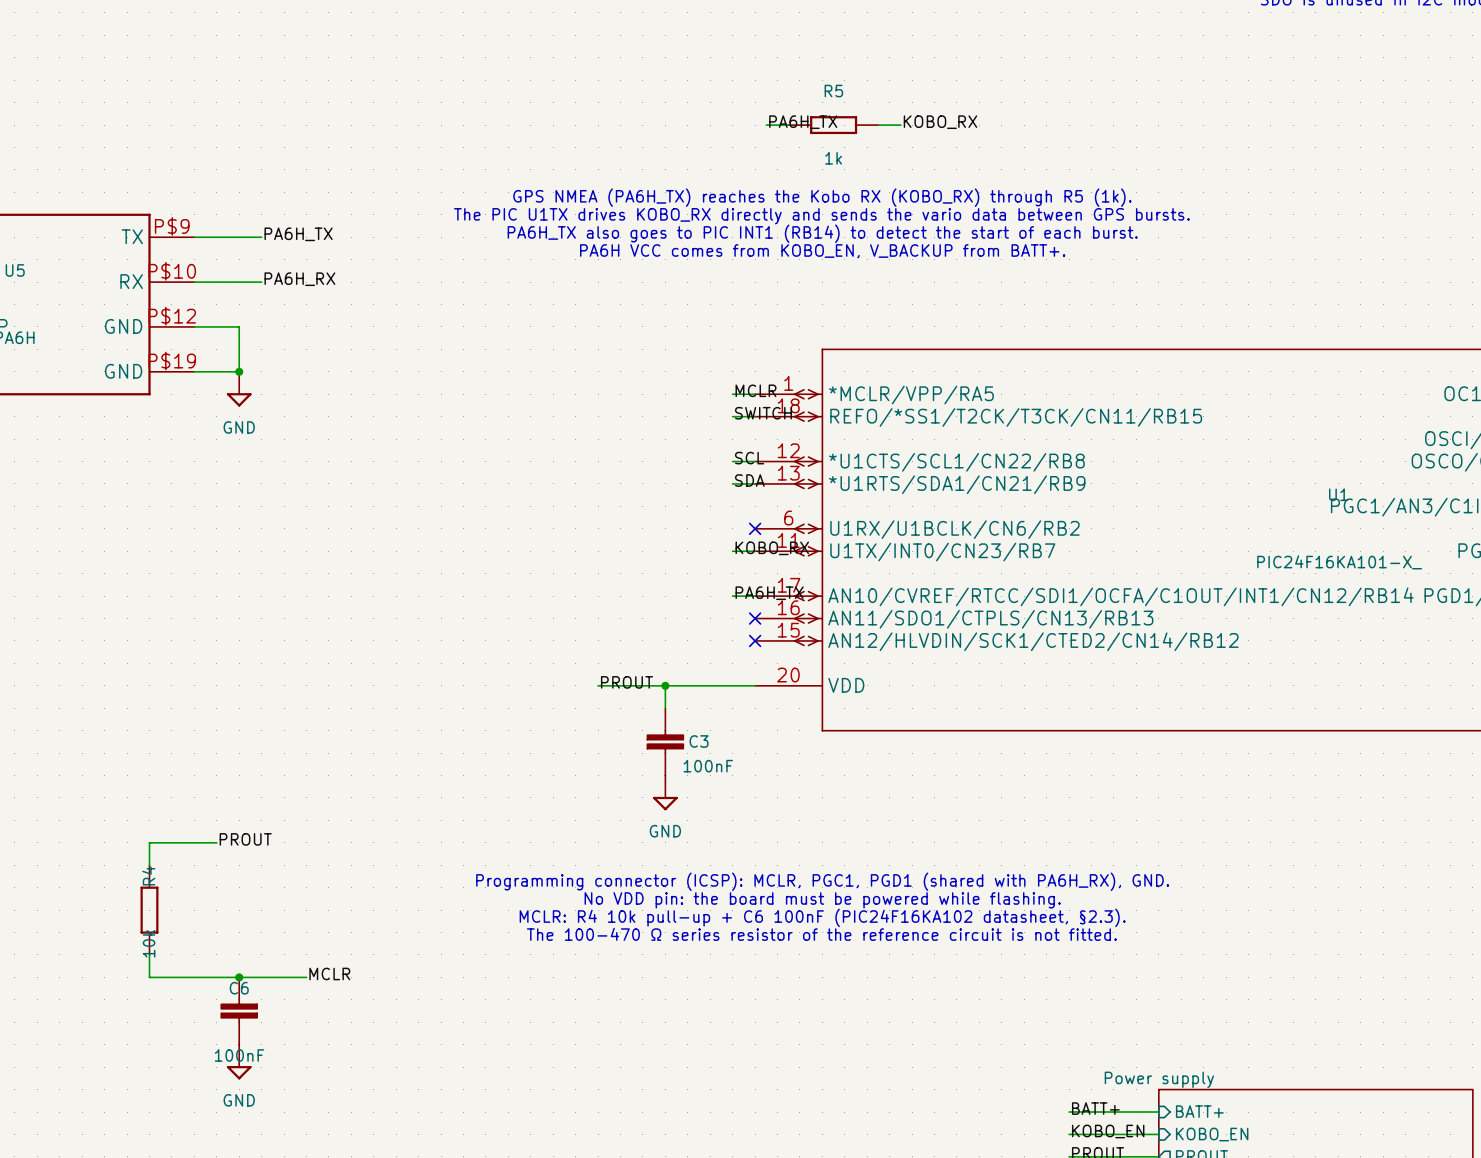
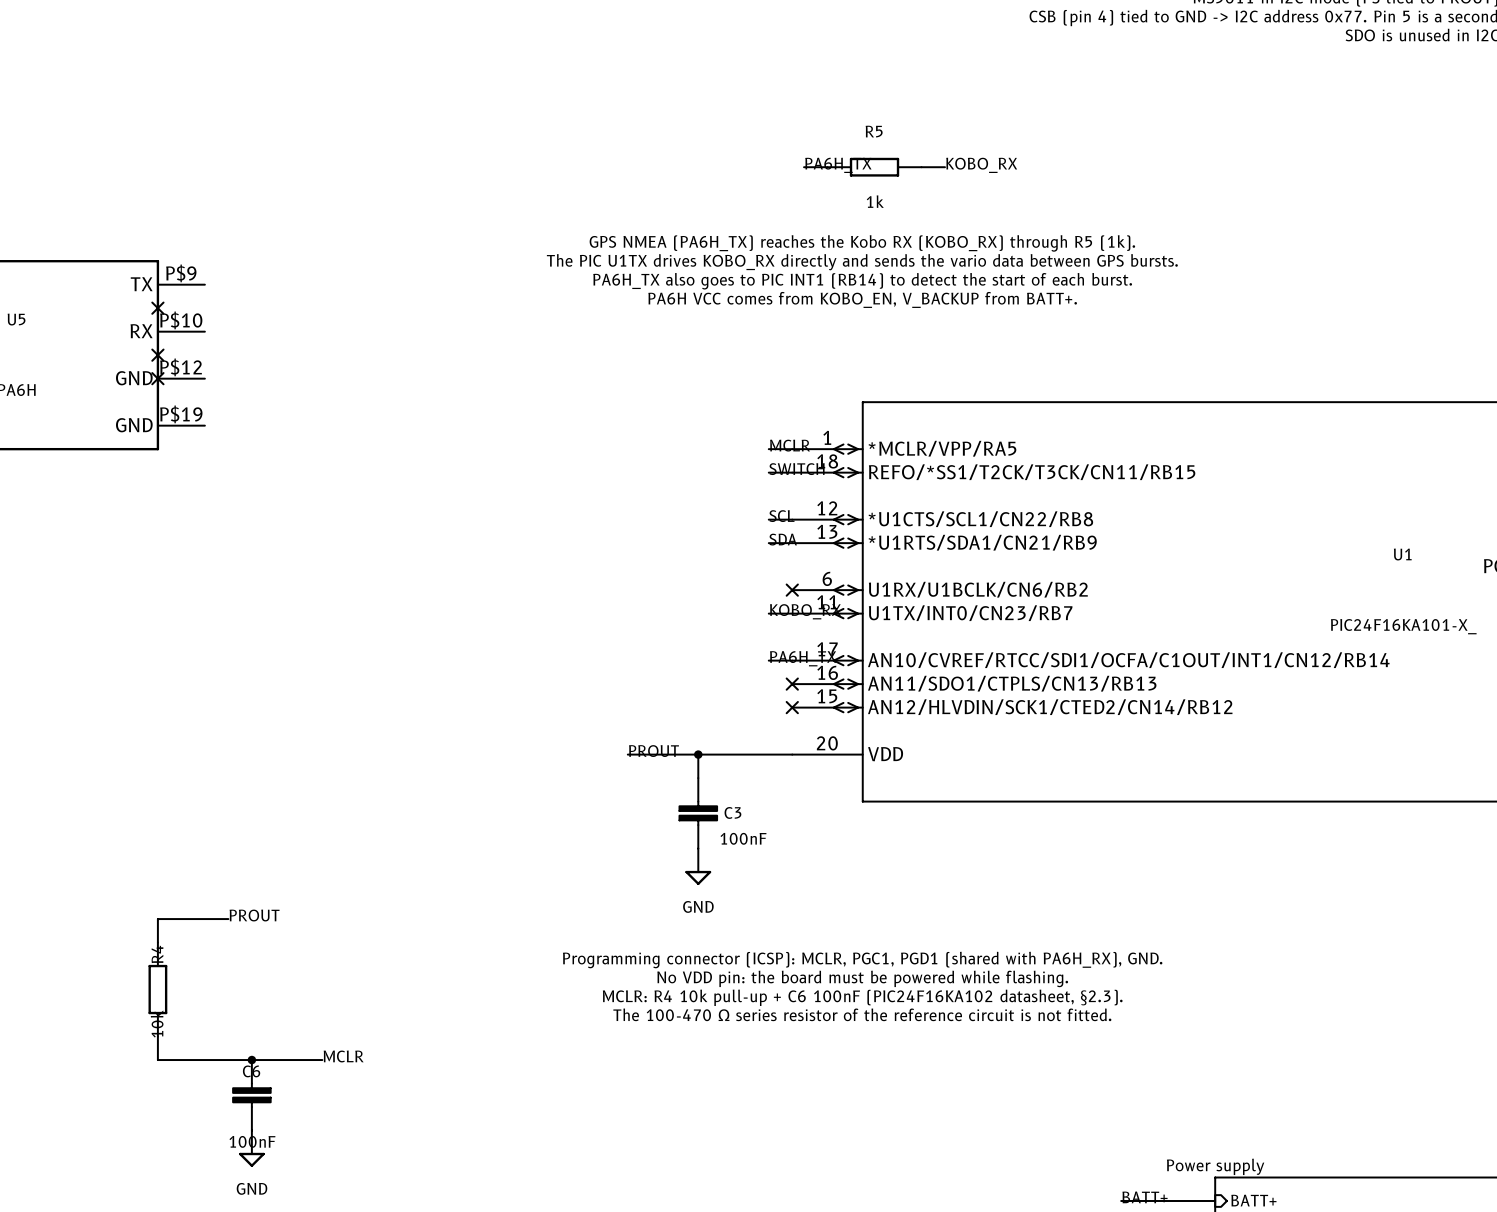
label: PA6H_TX (298, 234) -> none
wire: (194, 237) (261, 237) -> none
no-connect mark: none -> (157, 308)
label: PA6H_RX (299, 279) -> none
wire: (194, 282) (261, 282) -> none
no-connect mark: none -> (157, 355)
no-connect mark: none -> (157, 378)
wire: (194, 326) (239, 326) (239, 371) (194, 371) -> none
junction: (239, 371) -> none
power symbol: GND (239, 389) -> none

